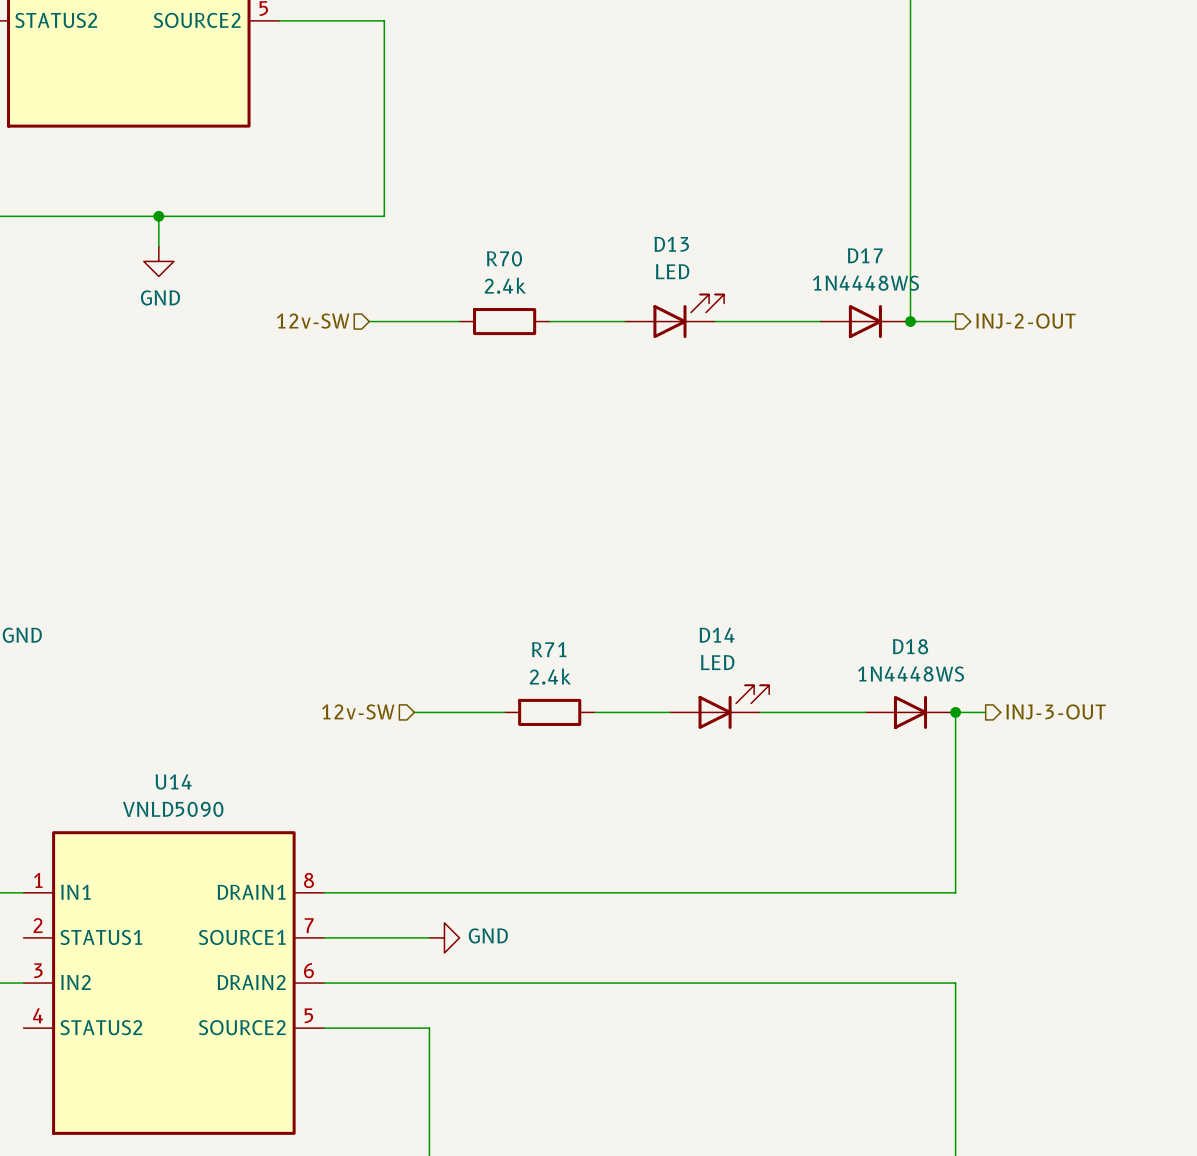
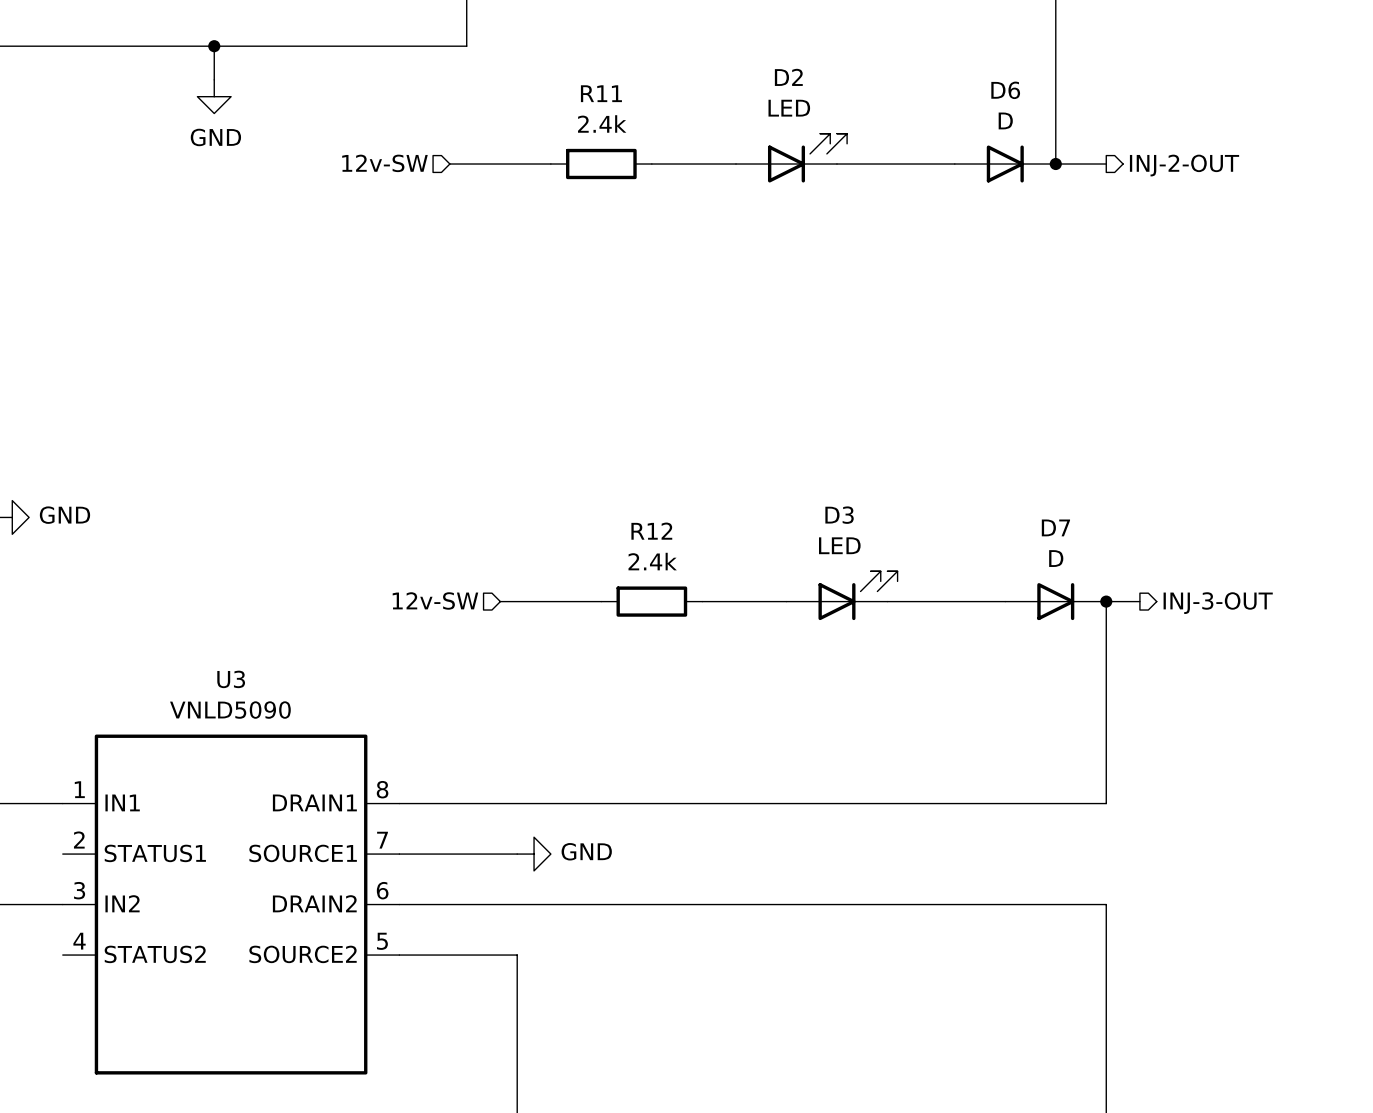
D13 name: D13 (671, 244) -> D2 (788, 77)
D17 name: D17 (865, 255) -> D6 (1005, 90)
R70 name: R70 (504, 258) -> R11 (601, 93)
D17 value: 1N4448WS (865, 283) -> D (1005, 120)
D14 name: D14 (717, 635) -> D3 (839, 515)
D18 name: D18 (910, 646) -> D7 (1055, 527)
R71 name: R71 (549, 649) -> R12 (651, 531)
D18 value: 1N4448WS (911, 674) -> D (1056, 558)
U14 name: U14 (173, 782) -> U3 (231, 679)

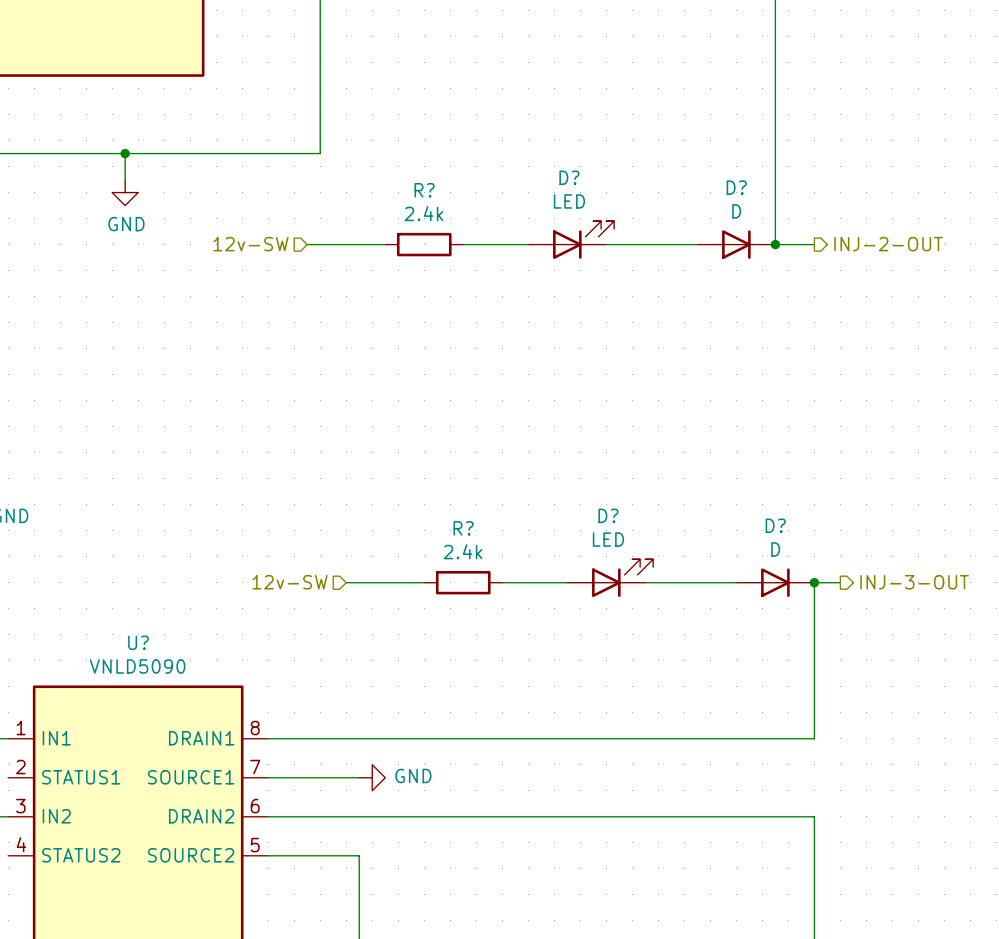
D2 name: D2 (788, 77) -> D? (569, 177)
D6 name: D6 (1005, 90) -> D? (736, 187)
R11 name: R11 (601, 93) -> R? (424, 190)
D3 name: D3 (839, 515) -> D? (608, 515)
D7 name: D7 (1055, 527) -> D? (775, 525)
R12 name: R12 (651, 531) -> R? (463, 528)
U3 name: U3 (231, 679) -> U? (138, 642)

